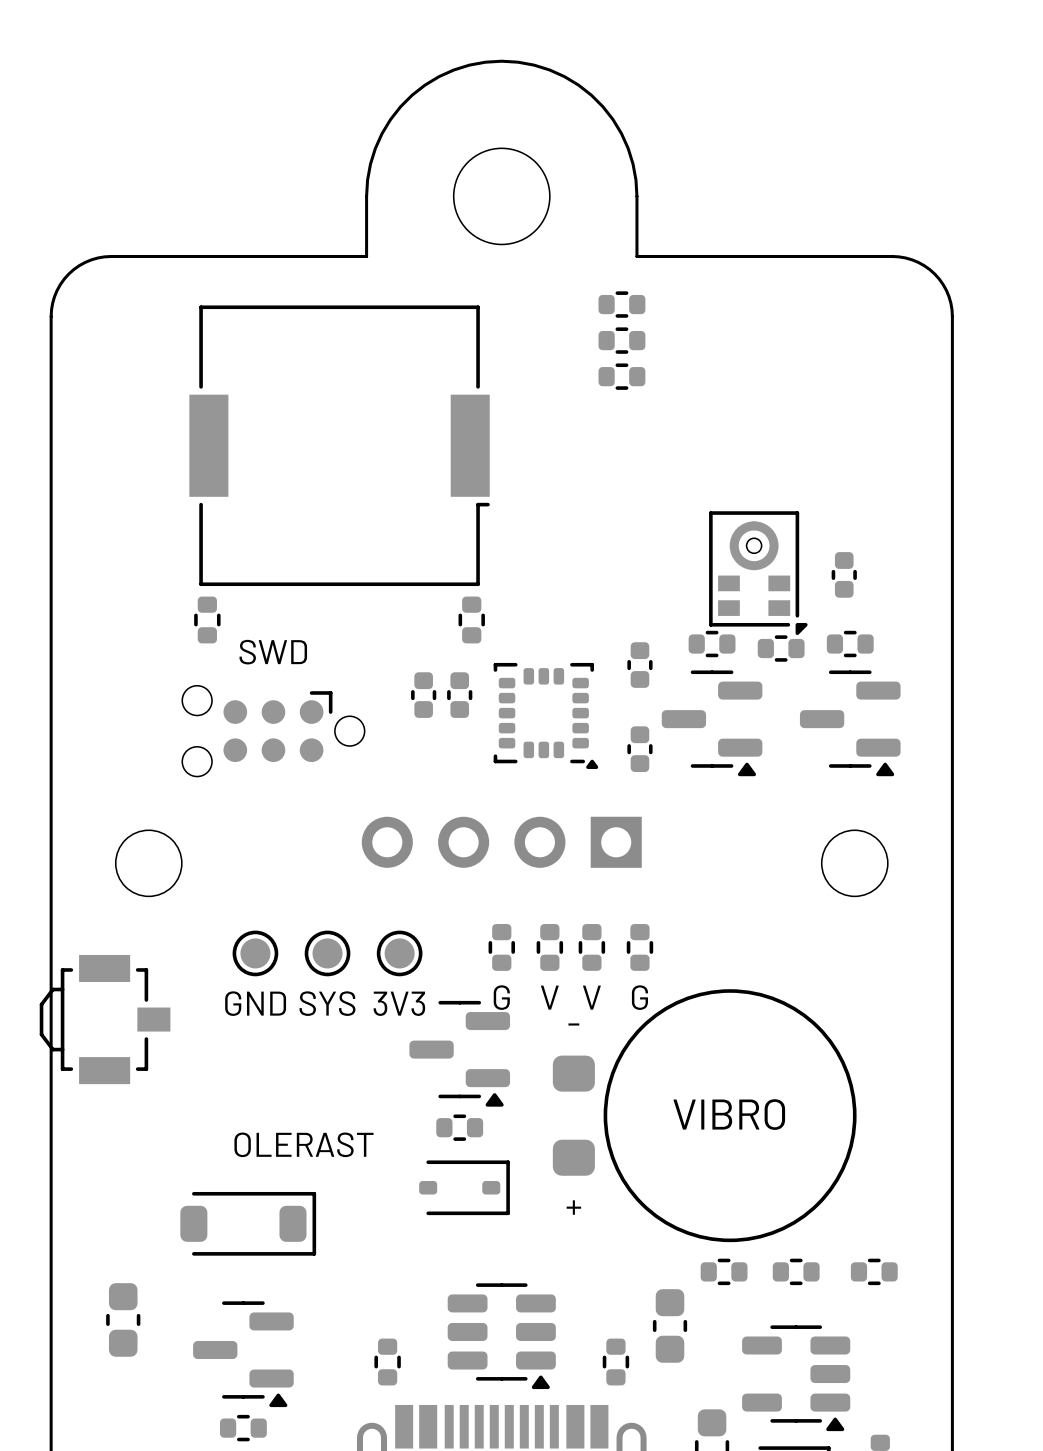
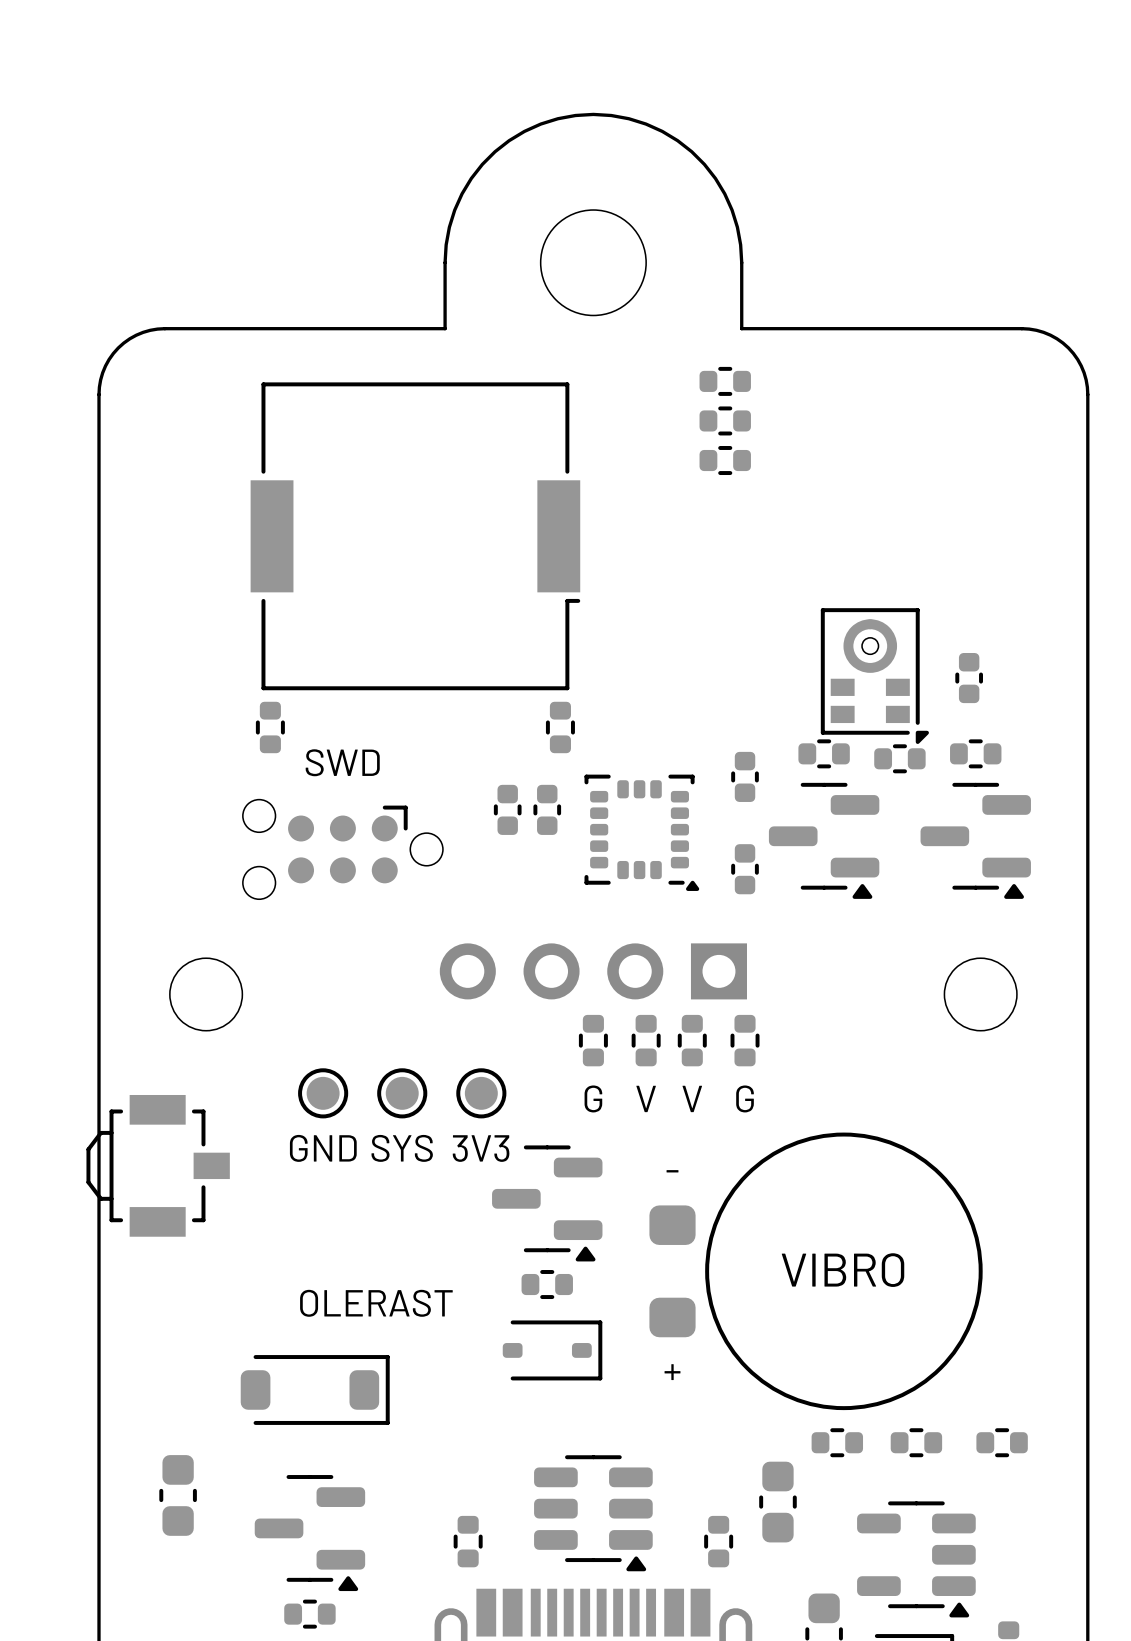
part: none -> (593, 1040)
part: none -> (646, 1040)
part: none -> (692, 1040)
part: none -> (745, 1040)
part: (501, 947) -> none
part: (549, 947) -> none
part: (591, 947) -> none
part: (639, 947) -> none
text position: G (501, 997) -> G (593, 1098)
text position: V (549, 997) -> V (646, 1098)
text position: V (591, 997) -> V (692, 1098)
text position: G (639, 997) -> G (745, 1098)

